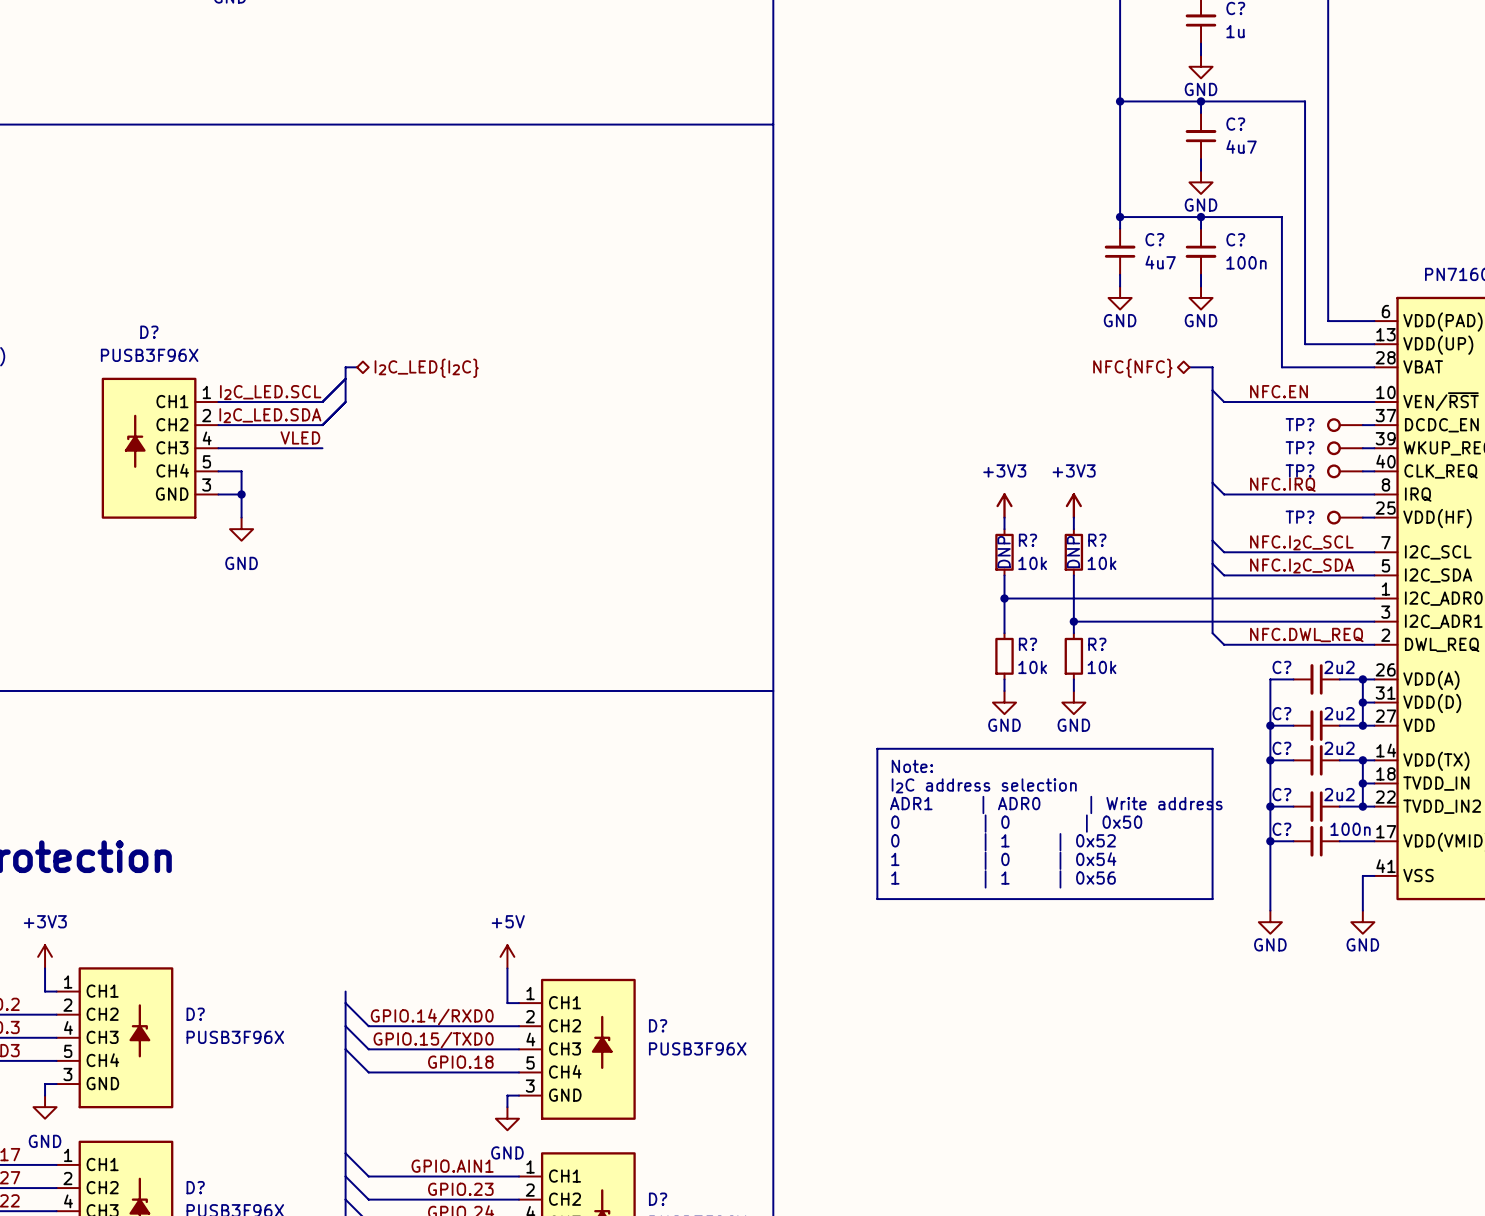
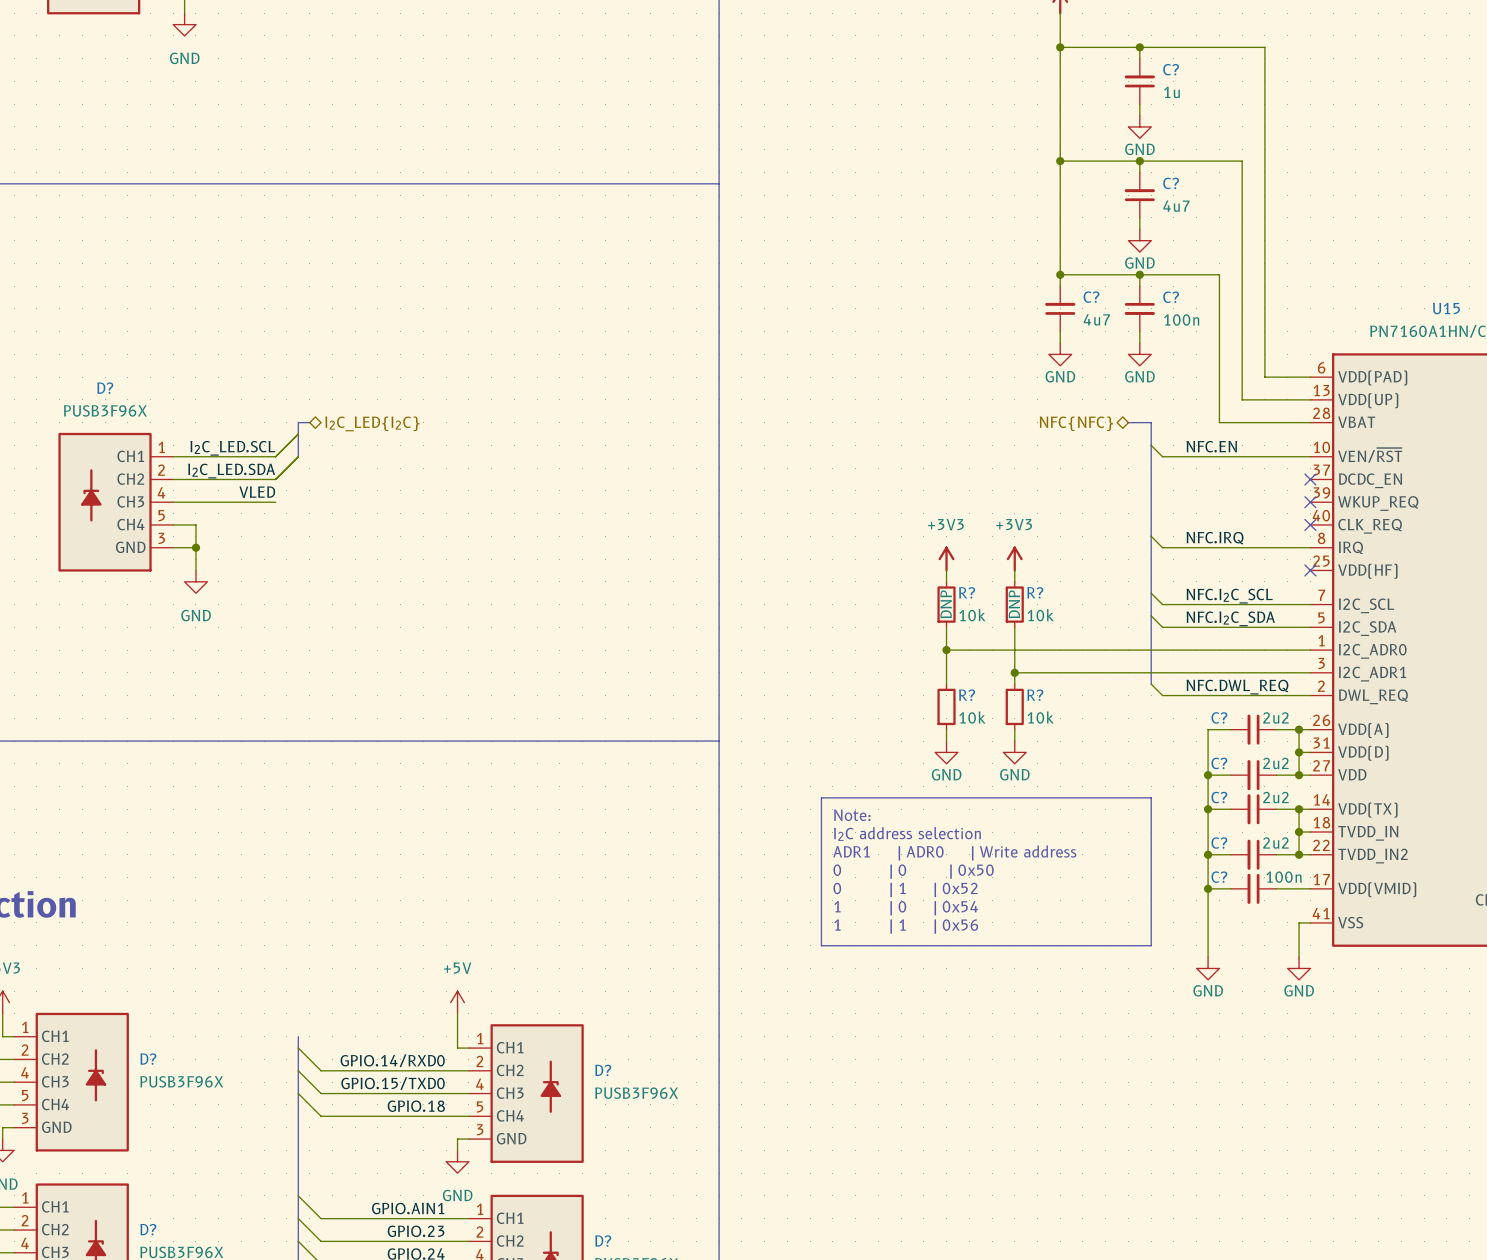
TP?: (1344, 425) -> none
wire: (1362, 425) (1374, 425) -> none
no-connect mark: none -> (1310, 479)
TP?: (1344, 448) -> none
wire: (1362, 448) (1374, 448) -> none
no-connect mark: none -> (1310, 502)
TP?: (1344, 471) -> none
wire: (1362, 471) (1374, 471) -> none
no-connect mark: none -> (1310, 524)
TP?: (1344, 517) -> none
wire: (1362, 517) (1374, 517) -> none
no-connect mark: none -> (1310, 570)

